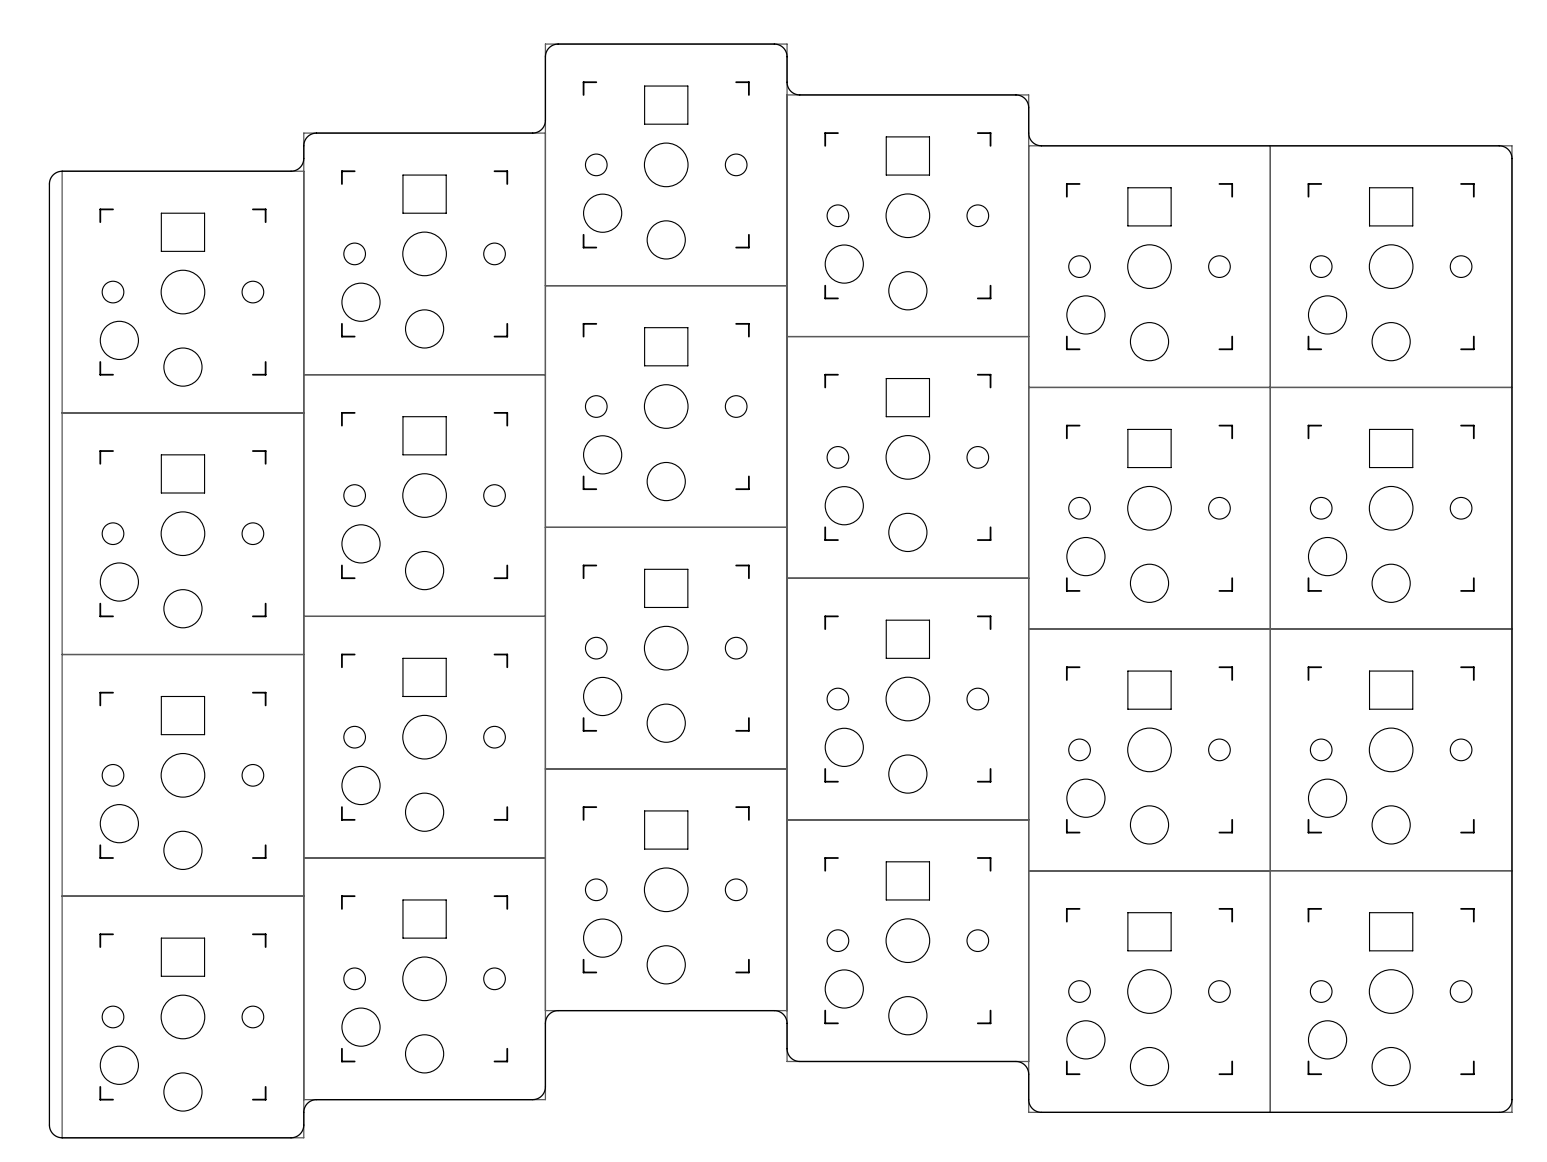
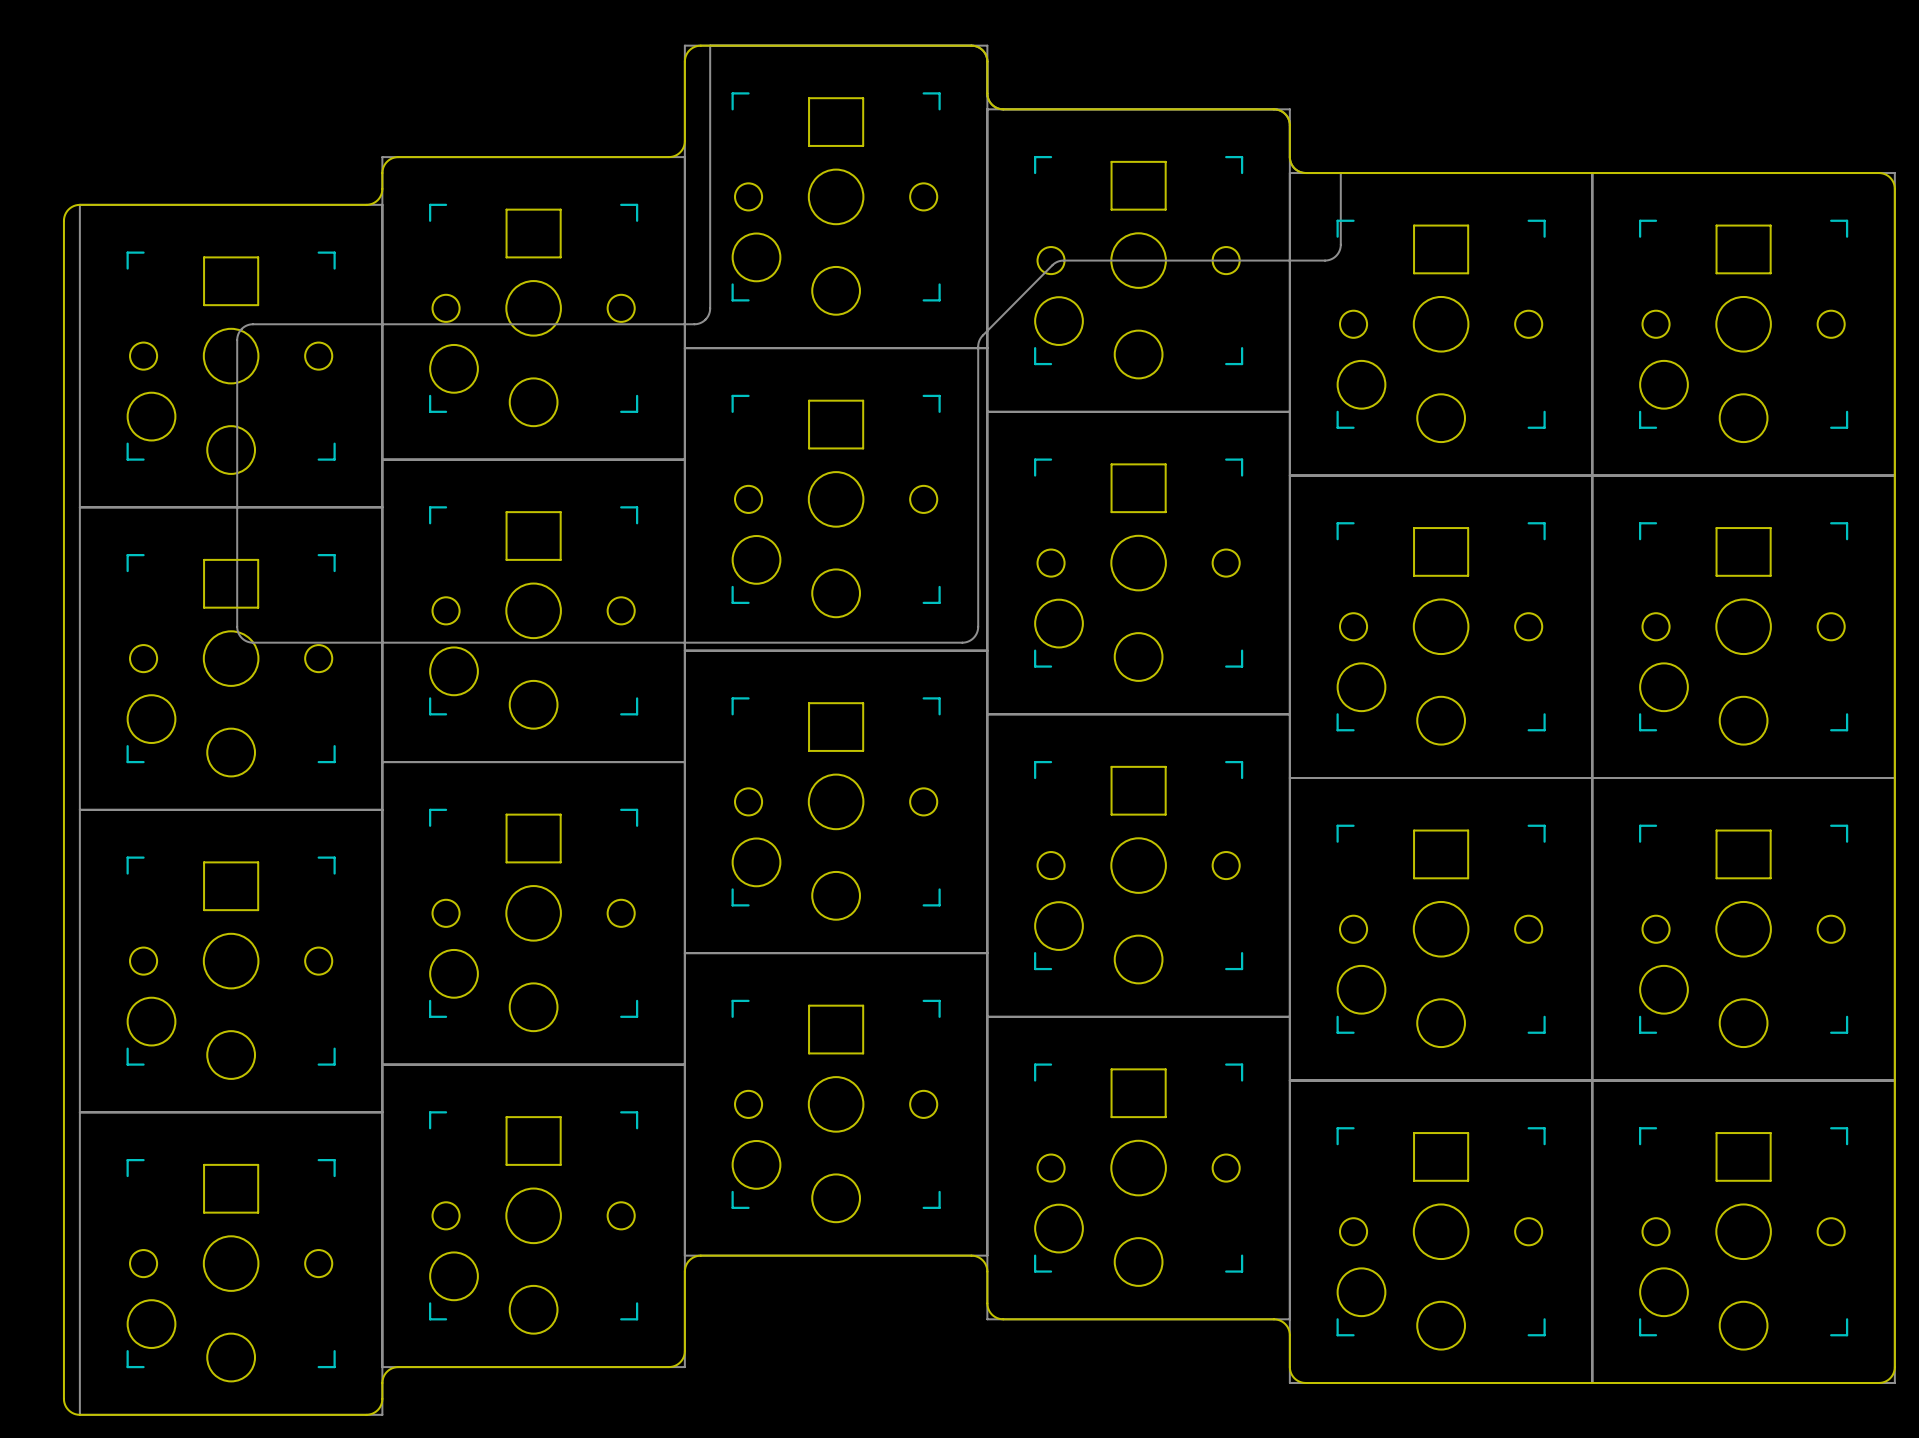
line: none -> (710, 45) (710, 309) (707, 316) (702, 322) (694, 324) (252, 324) (246, 325) (240, 330) (237, 340) (237, 626) (242, 639) (252, 642) (967, 641) (974, 636) (978, 628) (978, 346) (982, 335) (1052, 265) (1059, 261) (1325, 260) (1333, 257) (1340, 249) (1340, 173) (1303, 172) (1294, 168) (1289, 159) (1289, 121) (1285, 113) (1278, 109) (1001, 109) (993, 106) (988, 99) (986, 57) (982, 50) (975, 46) (710, 45)

